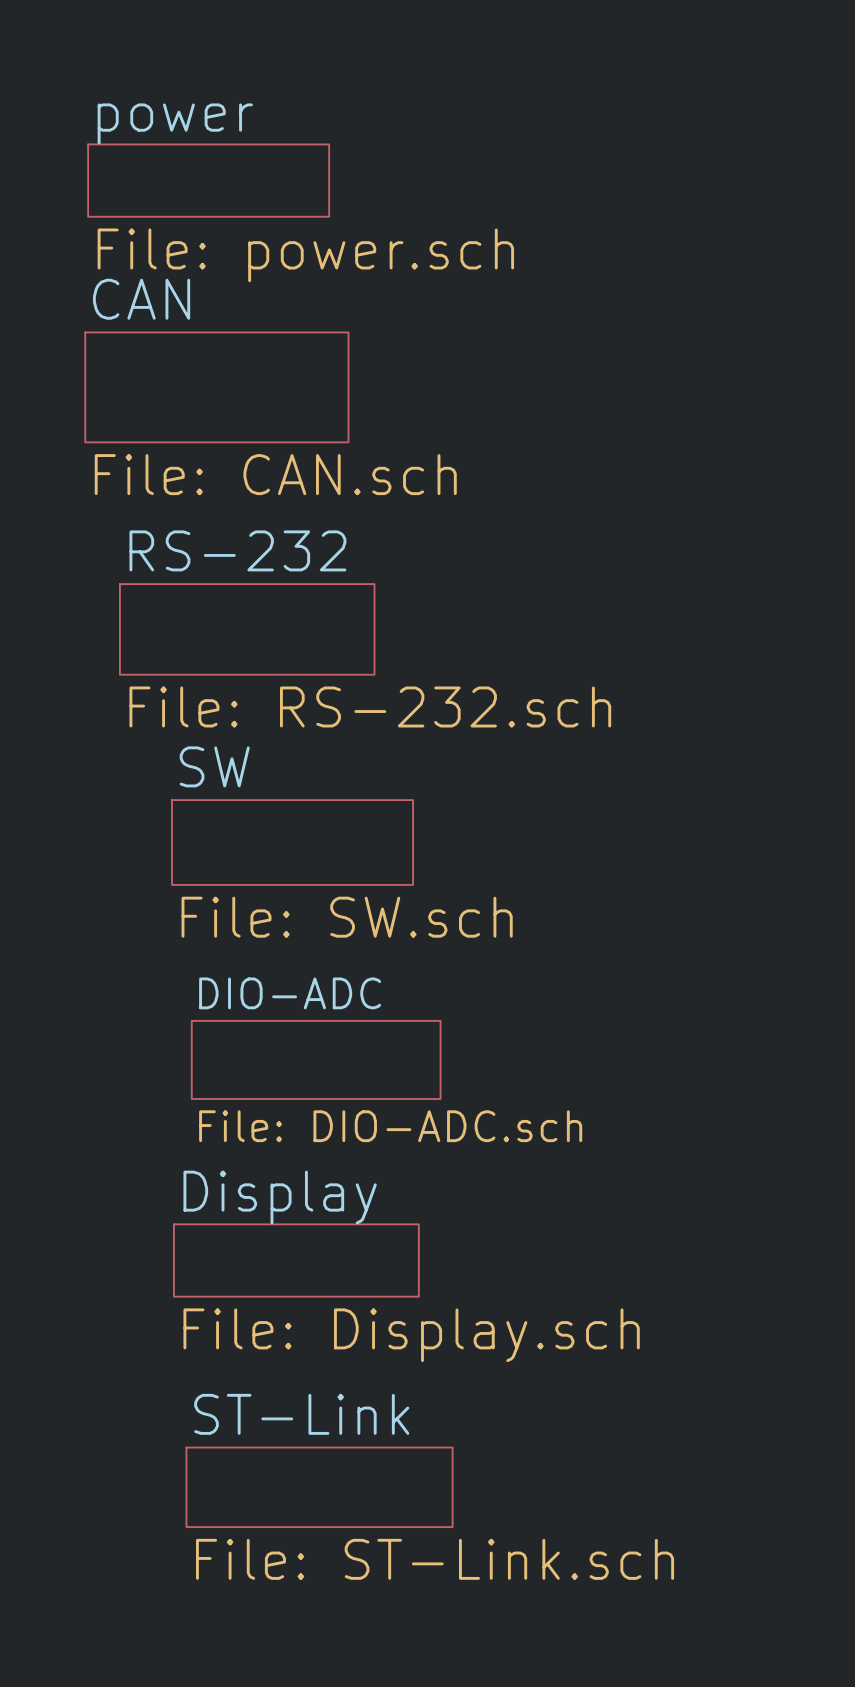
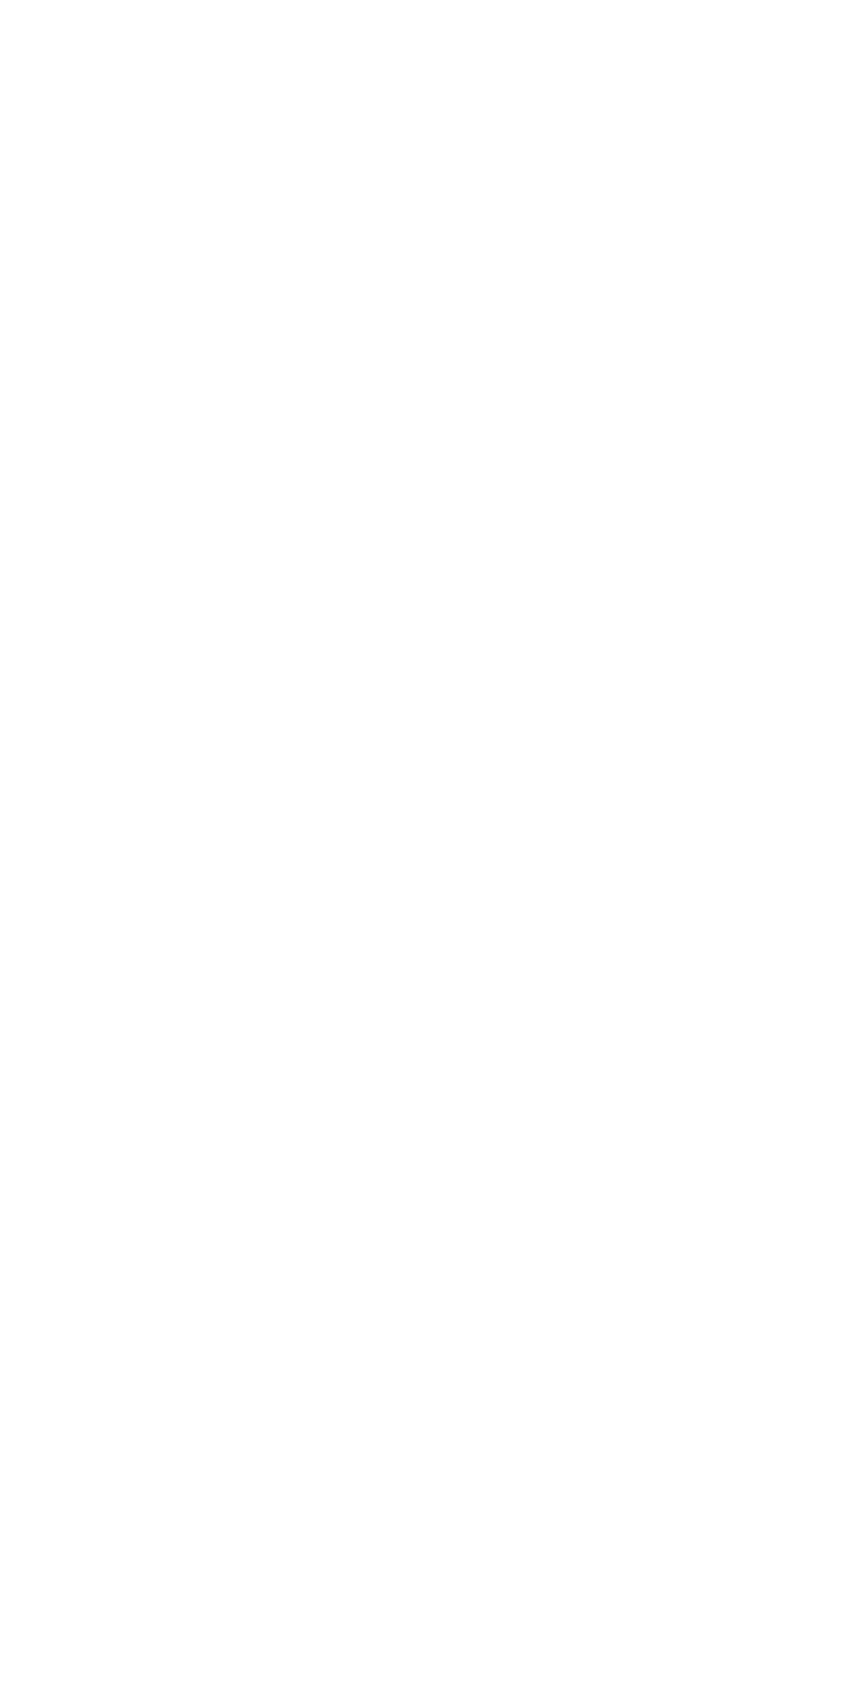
sheet power: File: power.sch (208, 180) -> none
sheet CAN: File: CAN.sch (216, 387) -> none
sheet RS-232: File: RS-232.sch (247, 629) -> none
sheet SW: File: SW.sch (292, 842) -> none
sheet DIO-ADC: File: DIO-ADC.sch (316, 1059) -> none
sheet Display: File: Display.sch (296, 1260) -> none
sheet ST-Link: File: ST-Link.sch (319, 1487) -> none

